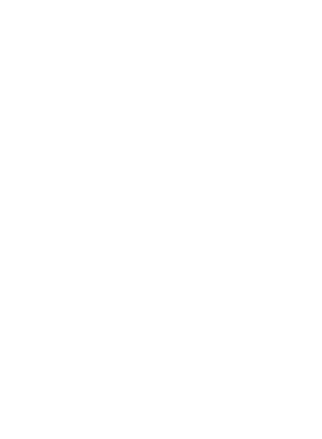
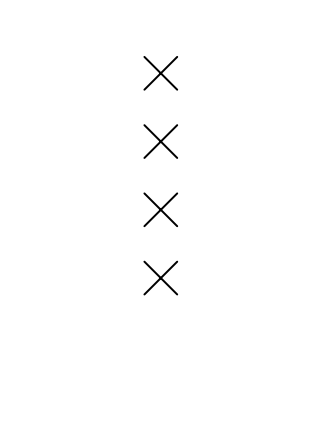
no-connect mark: none -> (160, 73)
no-connect mark: none -> (160, 141)
no-connect mark: none -> (160, 209)
no-connect mark: none -> (160, 278)

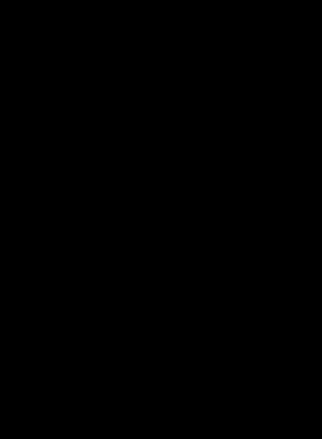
no-connect mark: (160, 73) -> none
no-connect mark: (160, 141) -> none
no-connect mark: (160, 209) -> none
no-connect mark: (160, 278) -> none

